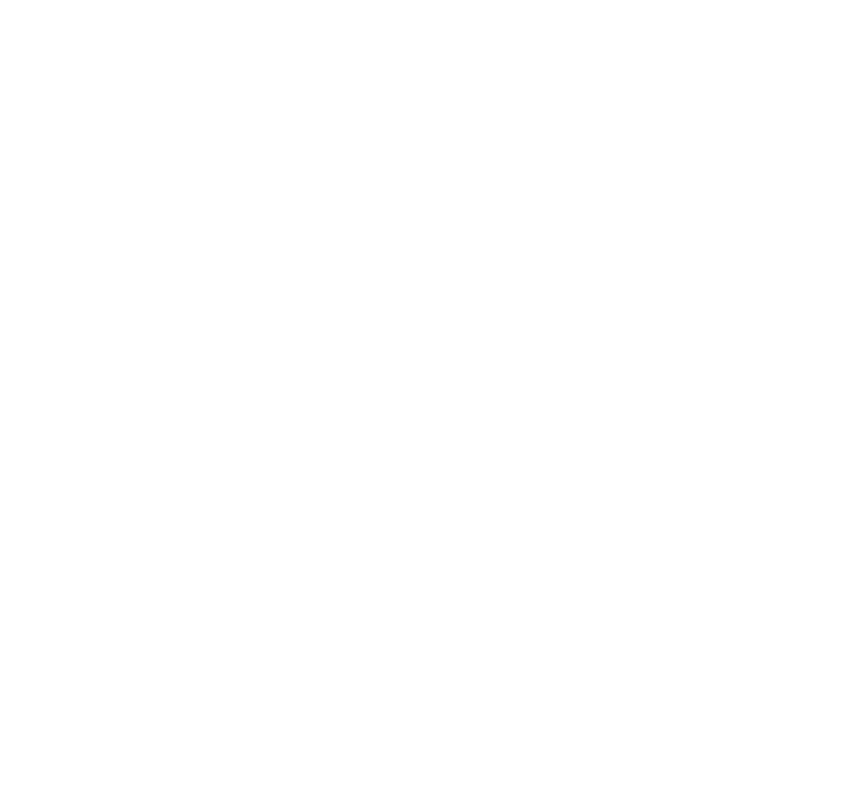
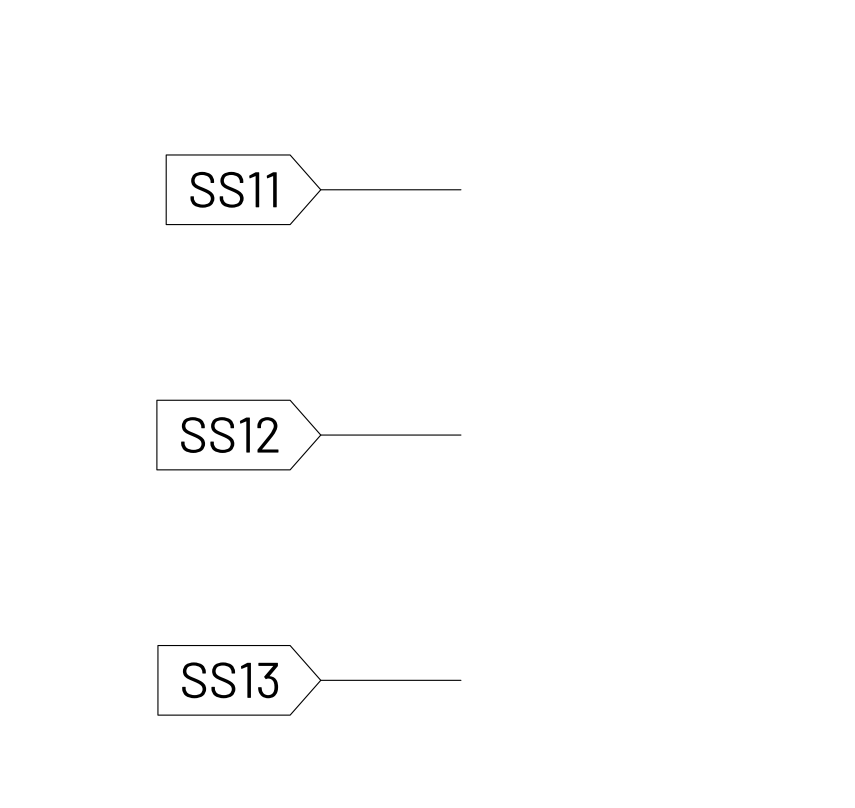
global label: none -> SS11 (233, 189)
wire: none -> (320, 189) (460, 189)
global label: none -> SS12 (229, 435)
wire: none -> (320, 435) (460, 435)
global label: none -> SS13 (230, 680)
wire: none -> (320, 680) (460, 680)

